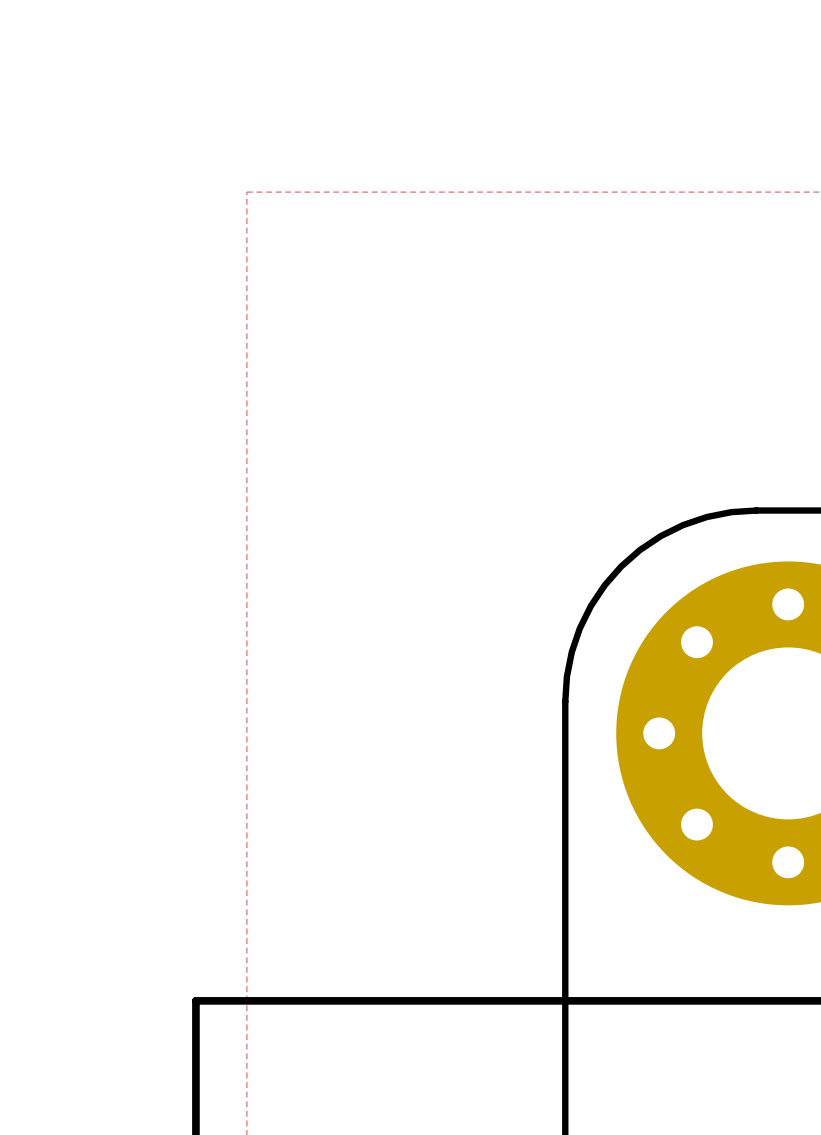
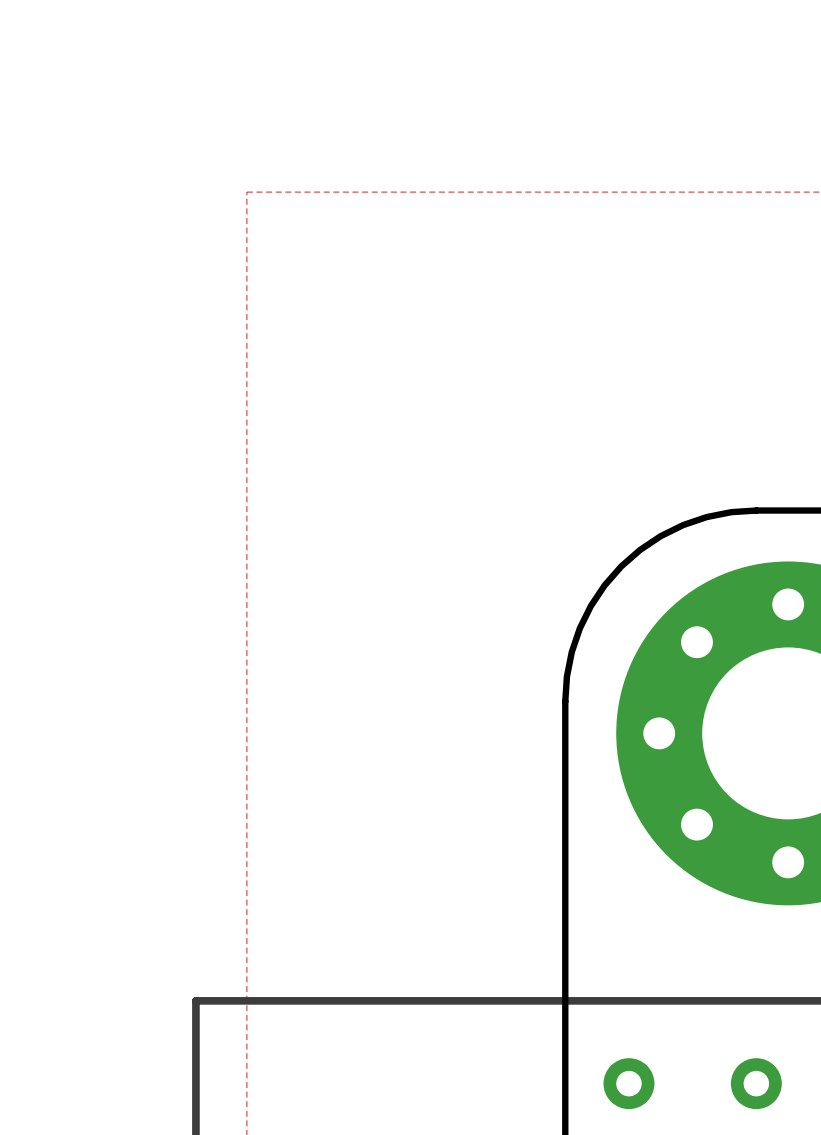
via: none -> (628, 1083)
via: none -> (756, 1083)

